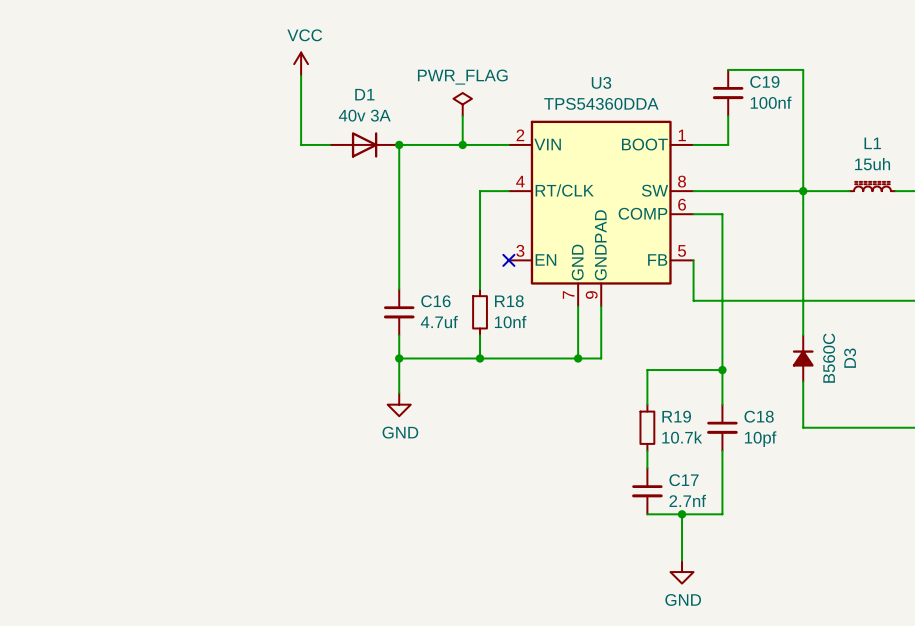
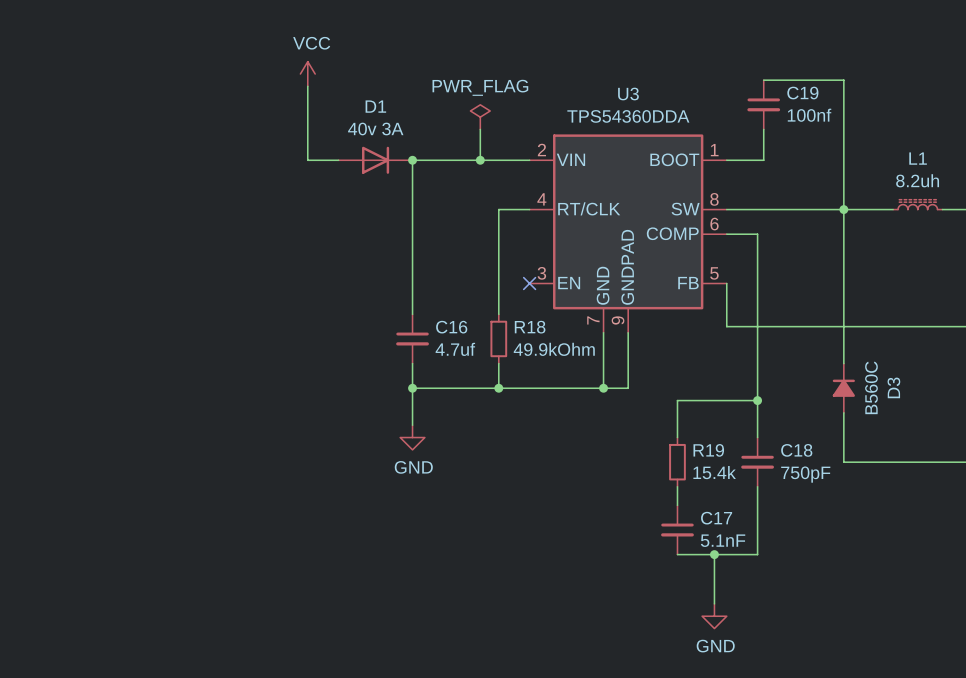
L1 value: 15uh (872, 164) -> 8.2uh (917, 180)
R18 value: 10nf (510, 322) -> 49.9kOhm (554, 349)
R19 value: 10.7k (682, 437) -> 15.4k (714, 472)
C18 value: 10pf (760, 439) -> 750pF (805, 474)
C17 value: 2.7nf (687, 500) -> 5.1nF (723, 540)

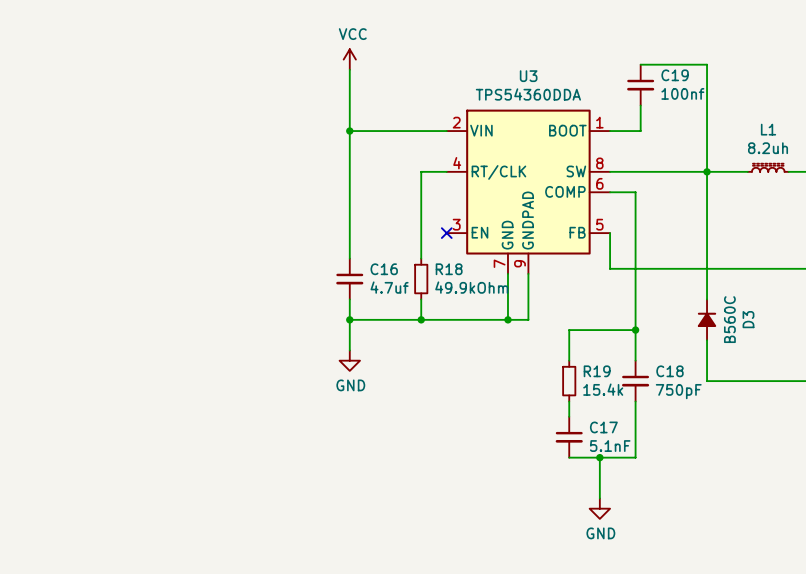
power symbol position: VCC (307, 74) -> VCC (349, 59)
wire: (307, 86) (307, 160) (338, 160) -> none
wire: none -> (349, 69) (349, 131)
power symbol: PWR_FLAG (480, 117) -> none
wire: (480, 129) (480, 160) -> none
D1: 40v 3A (375, 160) -> none
junction: (480, 160) -> none

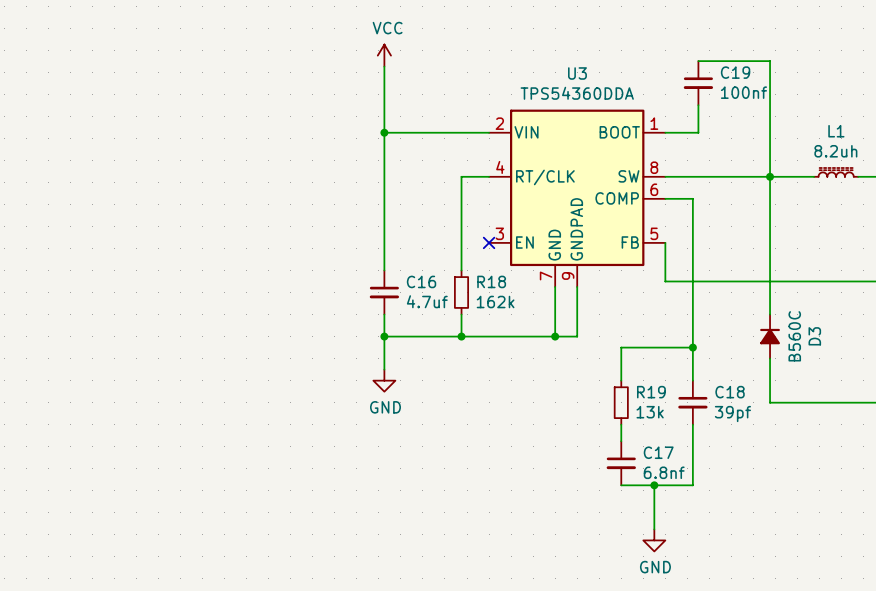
R18 value: 49.9kOhm (471, 287) -> 162k (495, 302)
R19 value: 15.4k (603, 389) -> 13k (650, 412)
C18 value: 750pF (678, 391) -> 39pf (732, 414)
C17 value: 5.1nF (610, 446) -> 6.8nf (664, 472)

